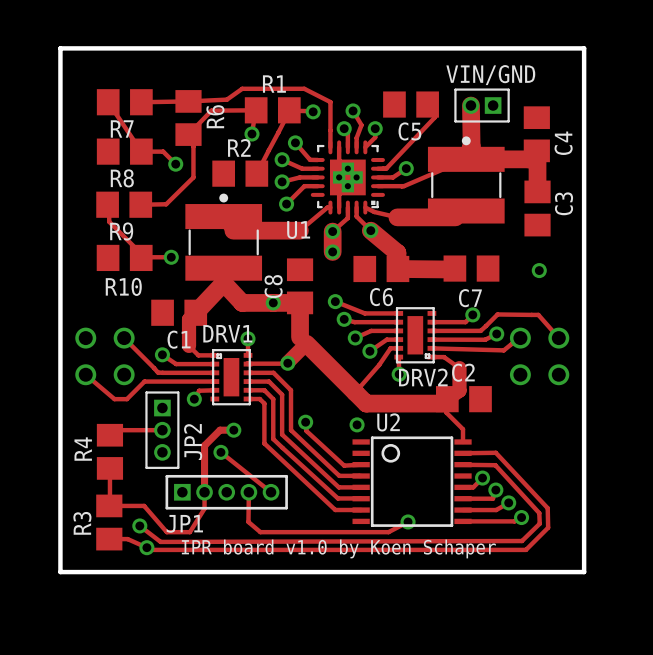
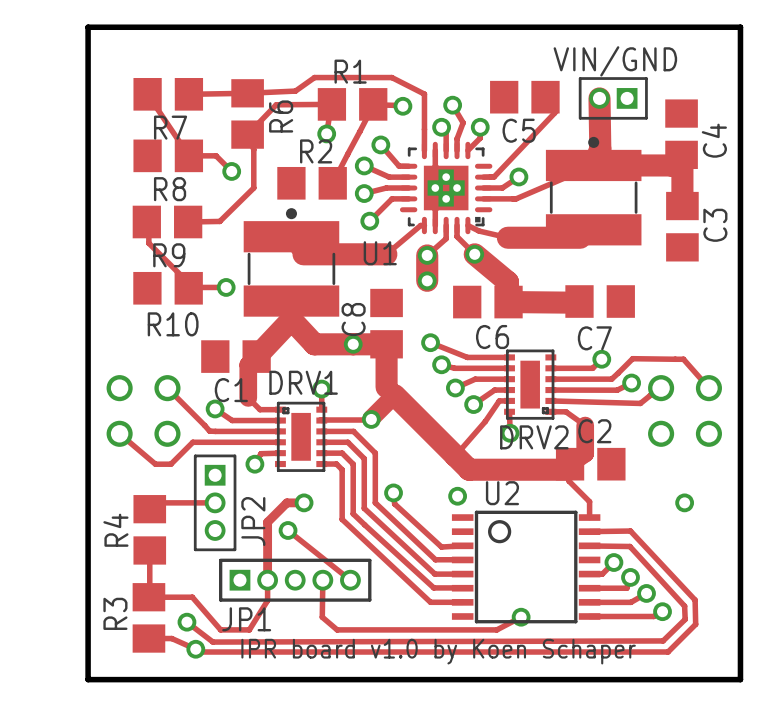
via: (539, 270) -> none
via: none -> (684, 502)

